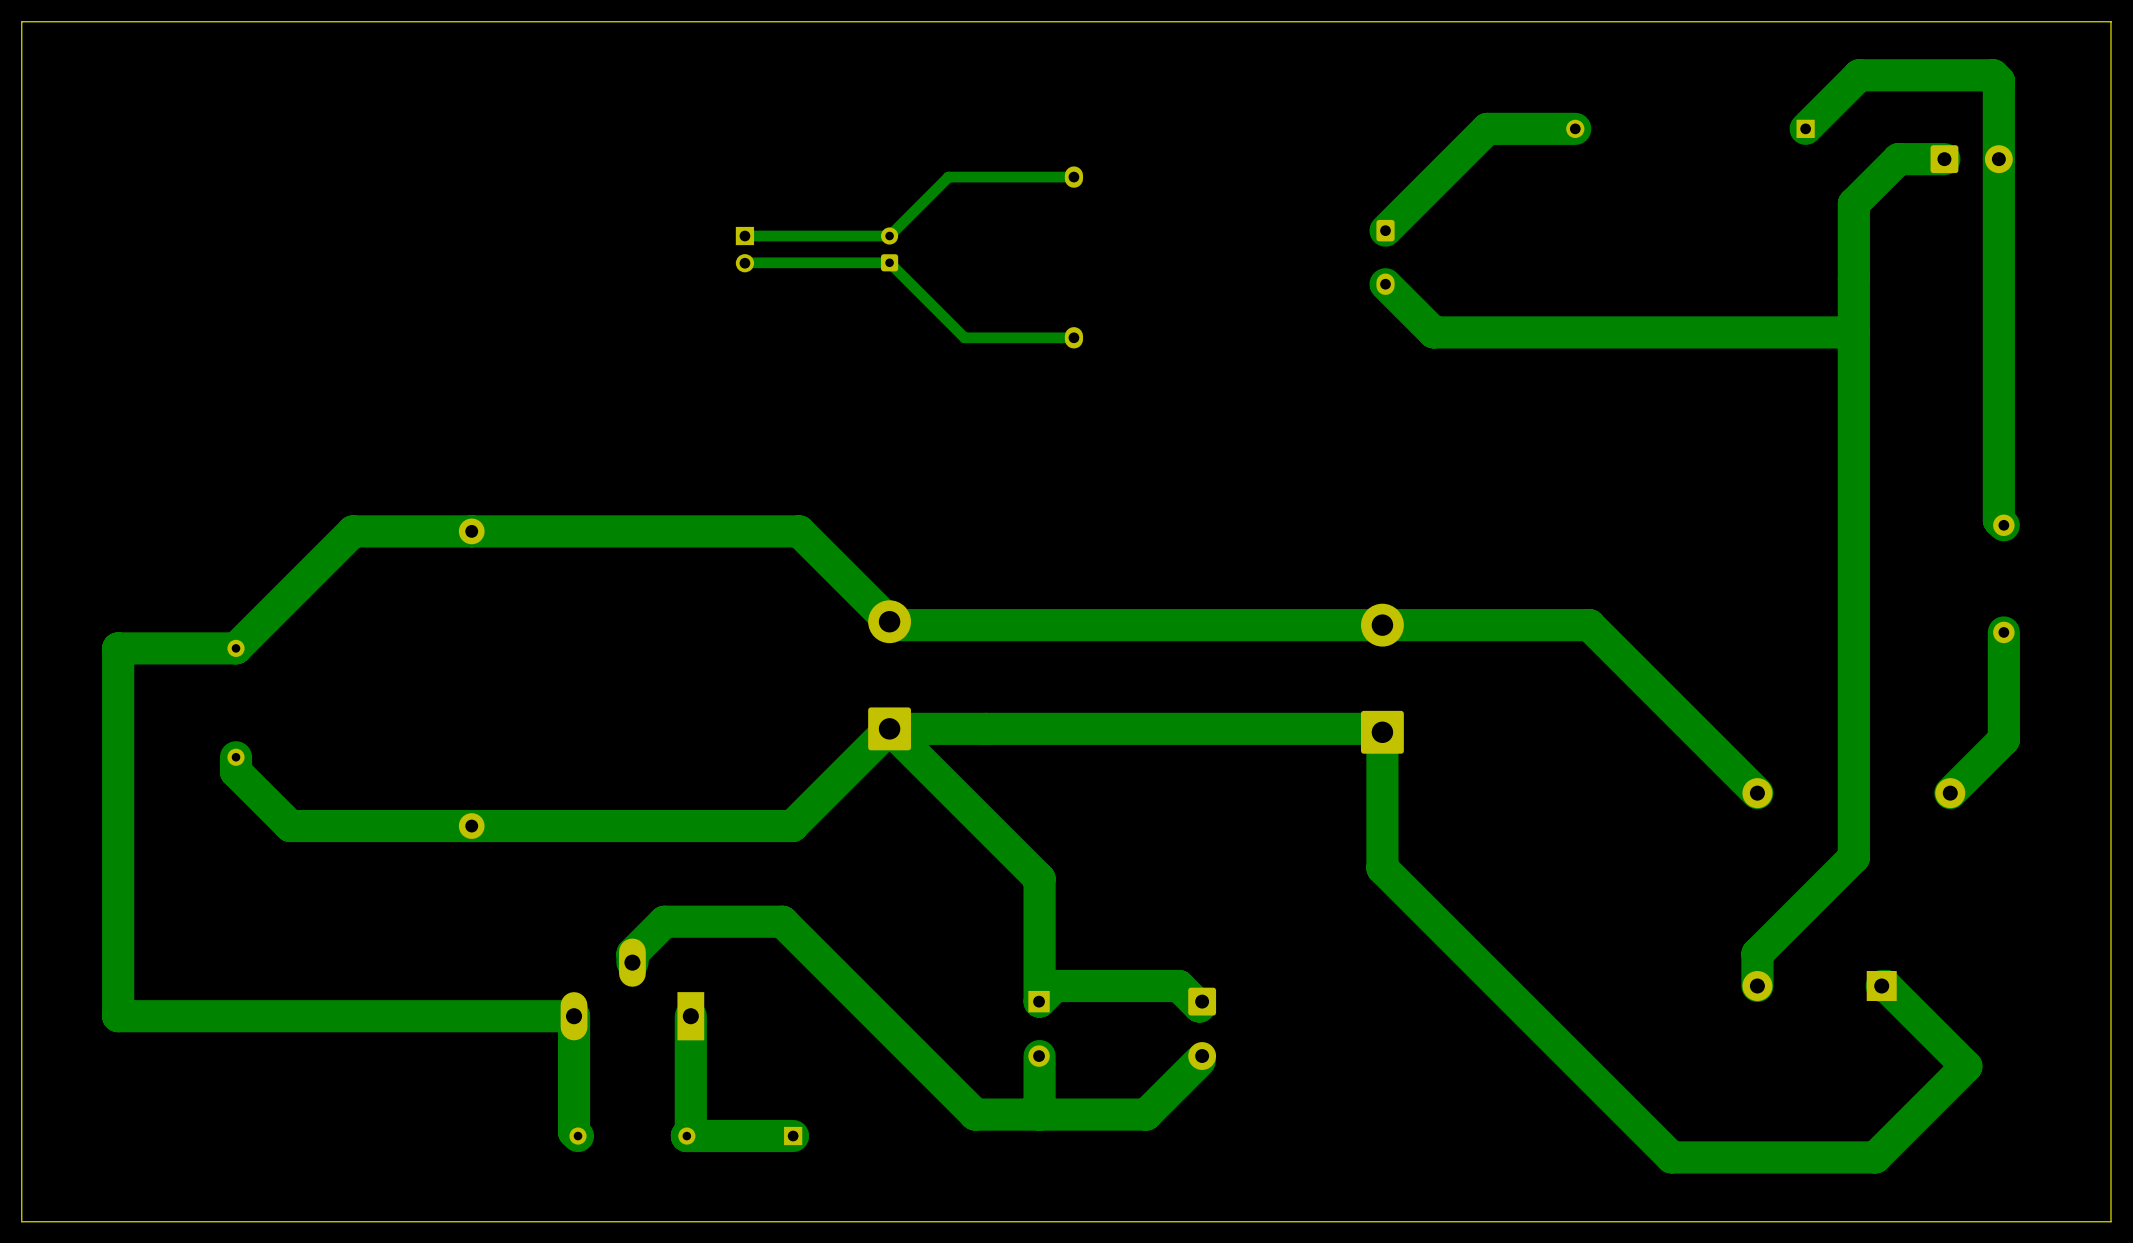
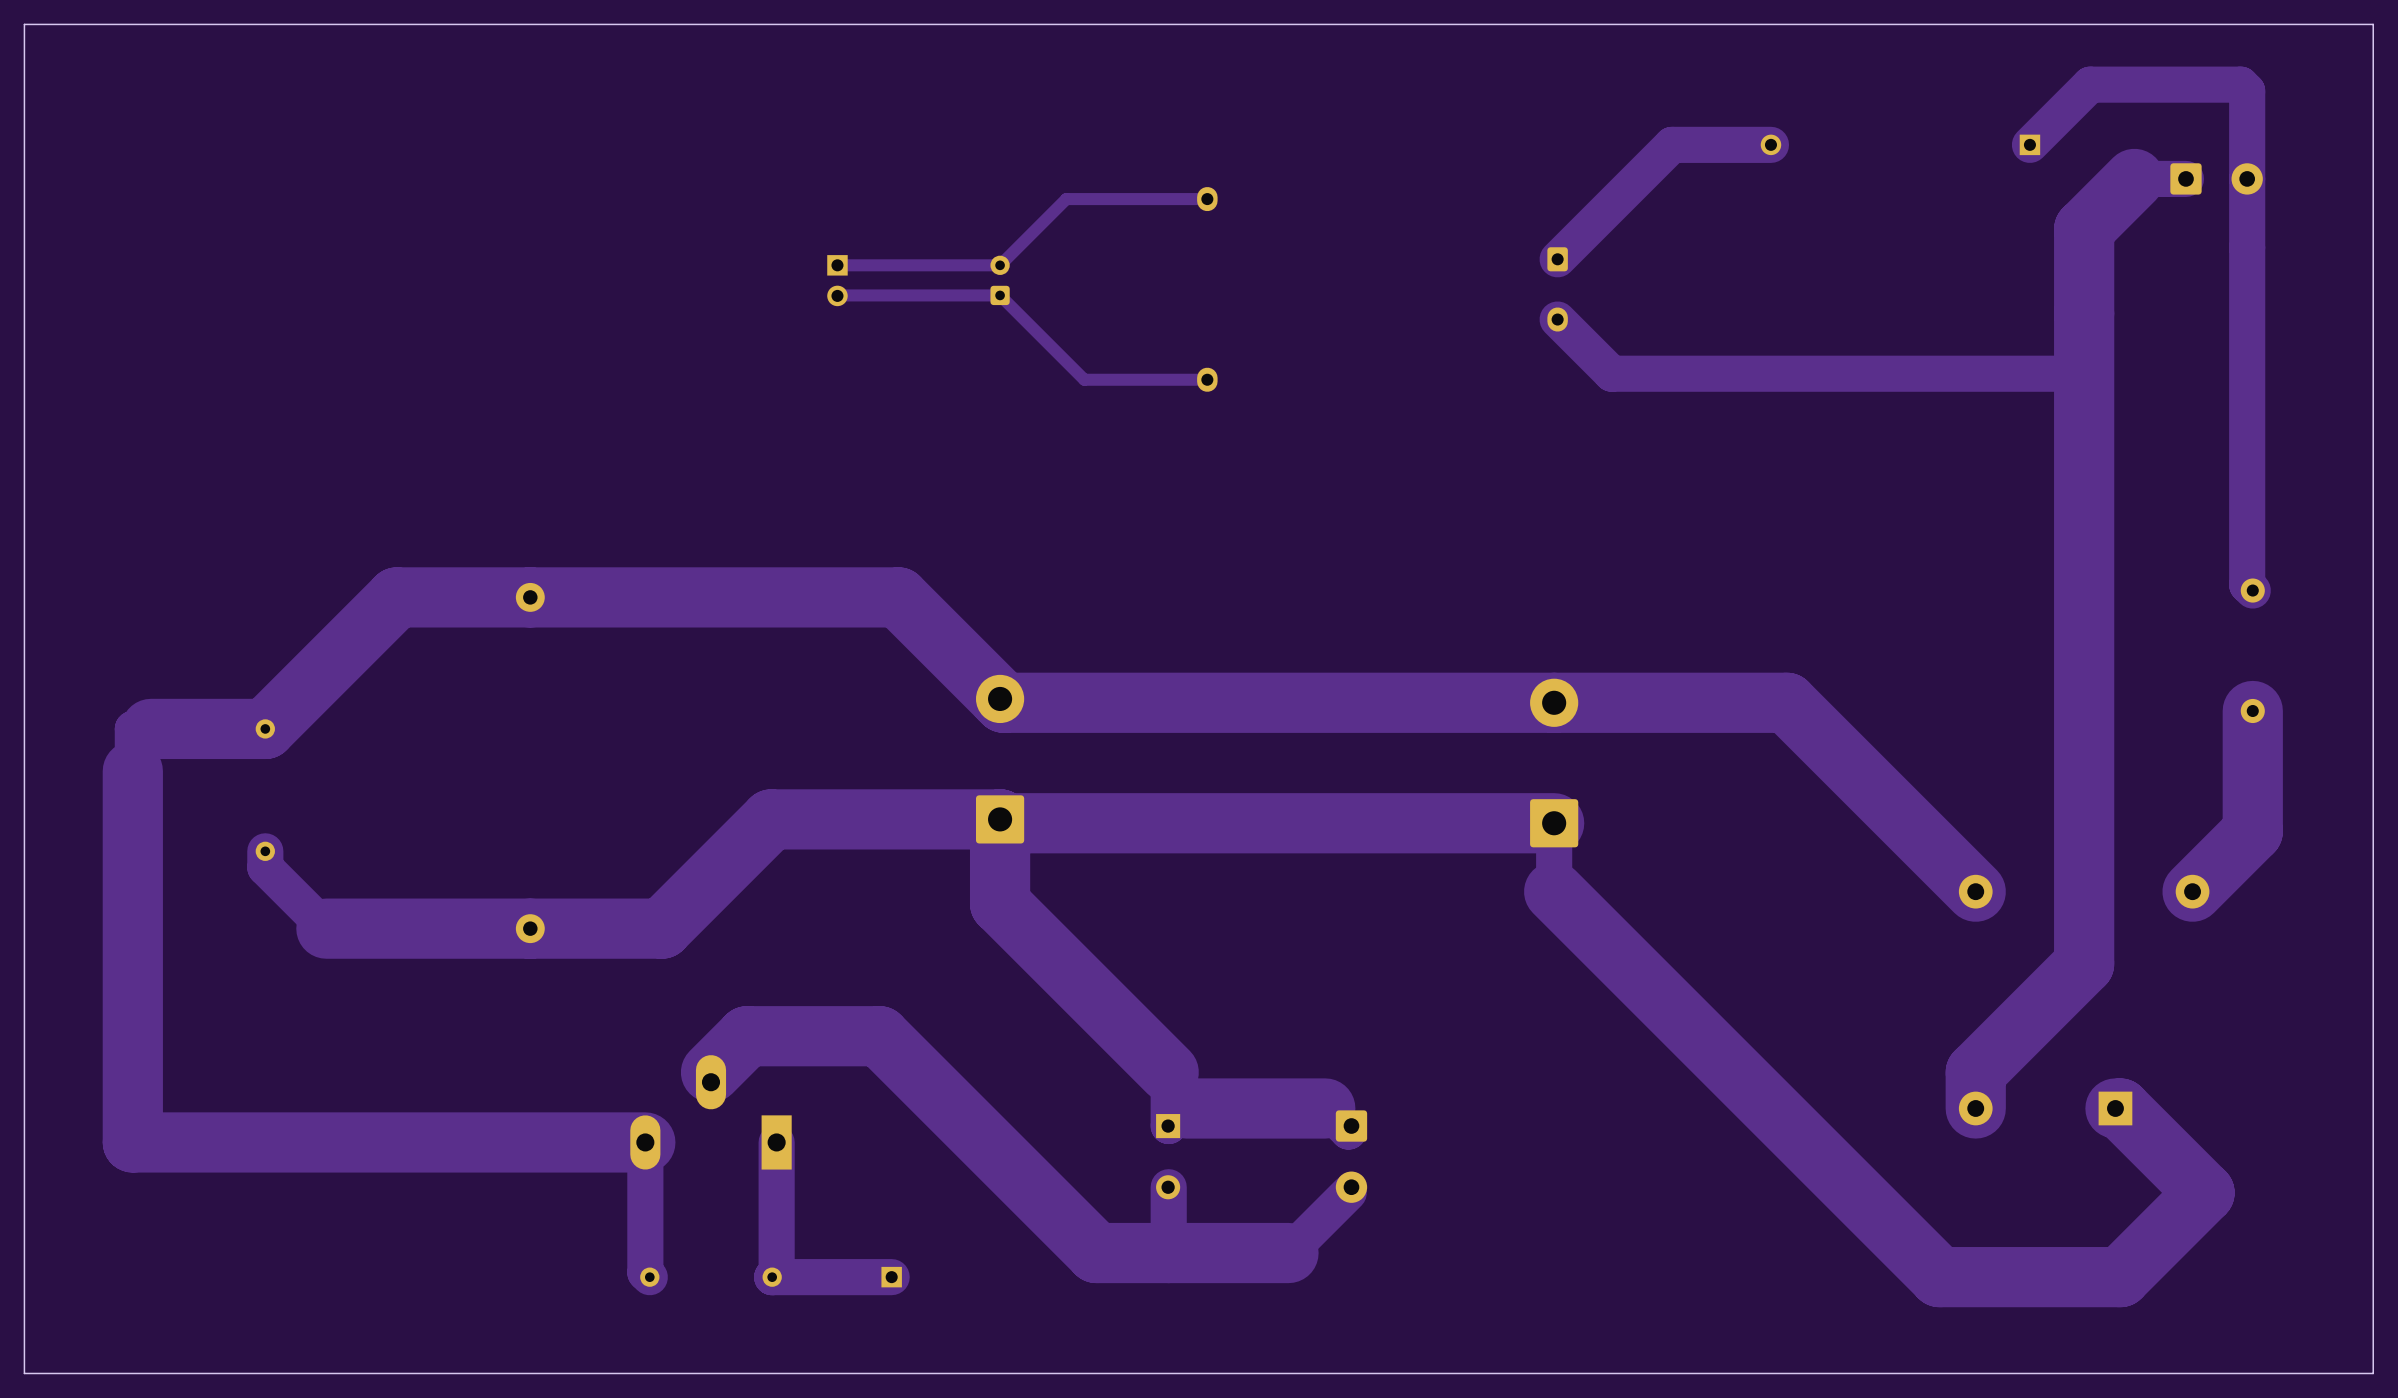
track width: thin (1898, 159) (1853, 203) (1853, 857) (1757, 953) (1757, 986) -> thick (2134, 178) (2084, 229) (2084, 963) (1975, 1072) (1975, 1108)
track width: thin (2003, 632) (2003, 739) (1950, 793) -> thick (2252, 710) (2252, 831) (2192, 891)
track width: thin (134, 648) (236, 648) (353, 531) (799, 531) (893, 625) (1589, 625) (1757, 793) -> thick (151, 728) (265, 728) (396, 597) (898, 597) (1003, 702) (1786, 702) (1975, 891)
track width: thin (118, 686) (118, 1016) (574, 1016) -> thick (132, 771) (132, 1142) (645, 1142)
track: (893, 732) (1039, 878) (1039, 953) -> (661, 928) (771, 819) (1000, 819) (1000, 903) (1168, 1072)
track: (1382, 732) (1379, 728) (889, 728) (792, 826) (588, 826) -> (1554, 823) (1003, 823)
track: (1382, 793) (1382, 868) (1671, 1157) (1875, 1157) (1966, 1066) (1961, 1061) -> (1554, 891) (1939, 1277) (2120, 1277) (2204, 1192)
track width: thin (588, 826) (290, 826) -> thick (661, 928) (326, 928)
track width: thin (632, 953) (664, 921) (782, 921) (975, 1114) (1146, 1114) -> thick (710, 1072) (747, 1036) (879, 1036) (1096, 1253) (1288, 1253)
track width: thin (1178, 986) (1055, 986) -> thick (1325, 1108) (1186, 1108)
track width: thin (1881, 986) (1886, 986) (1961, 1061) -> thick (2115, 1108) (2120, 1108) (2204, 1192)

